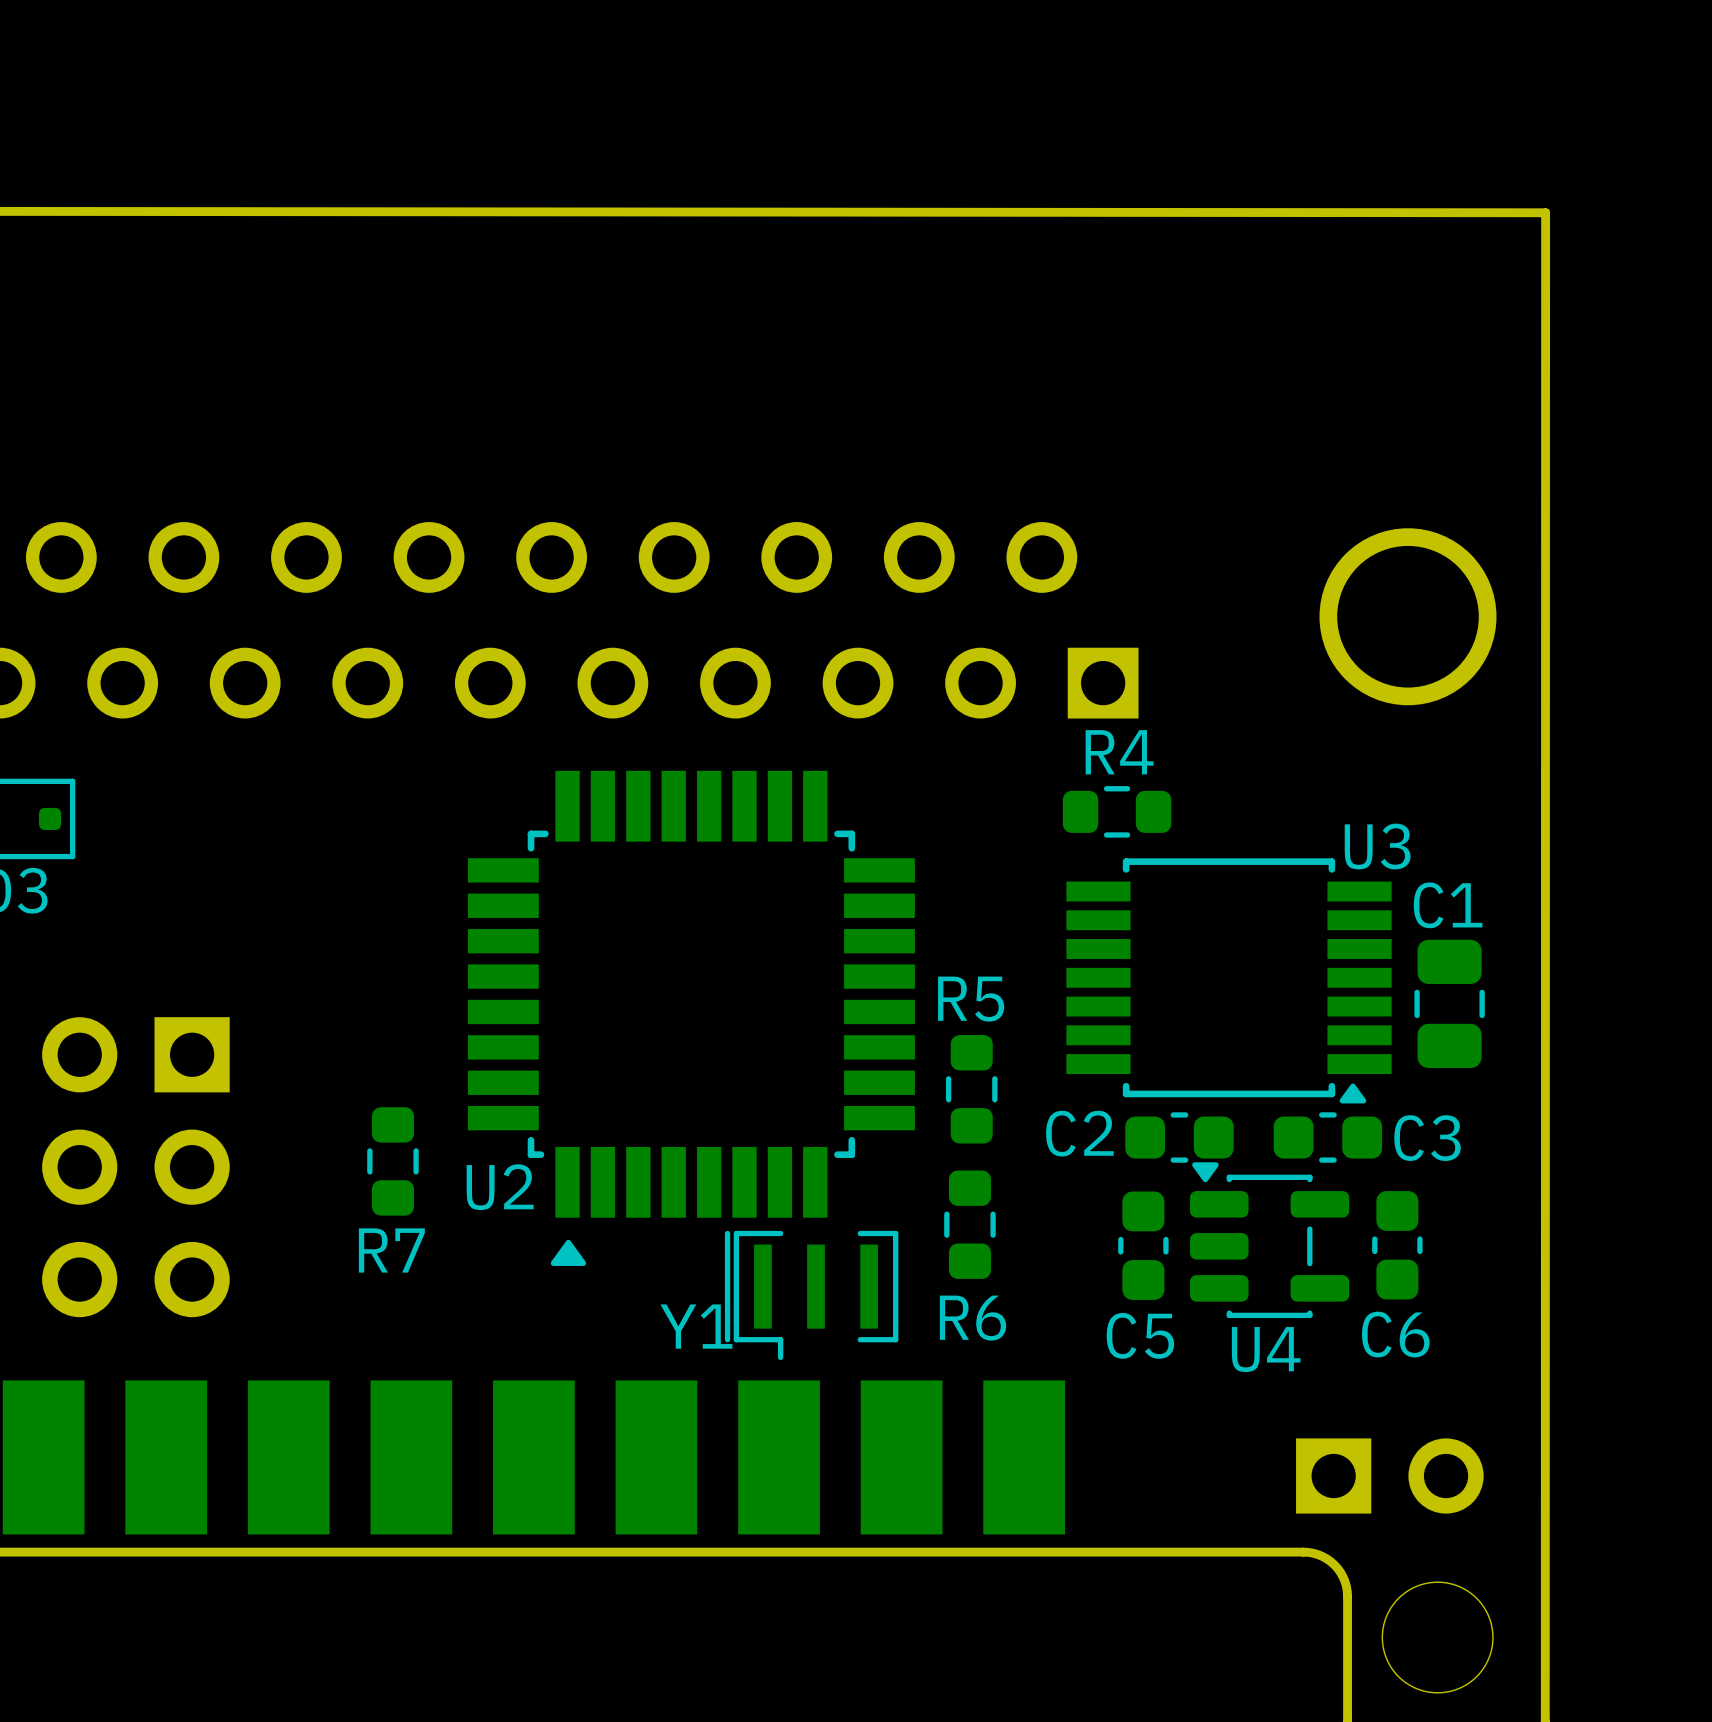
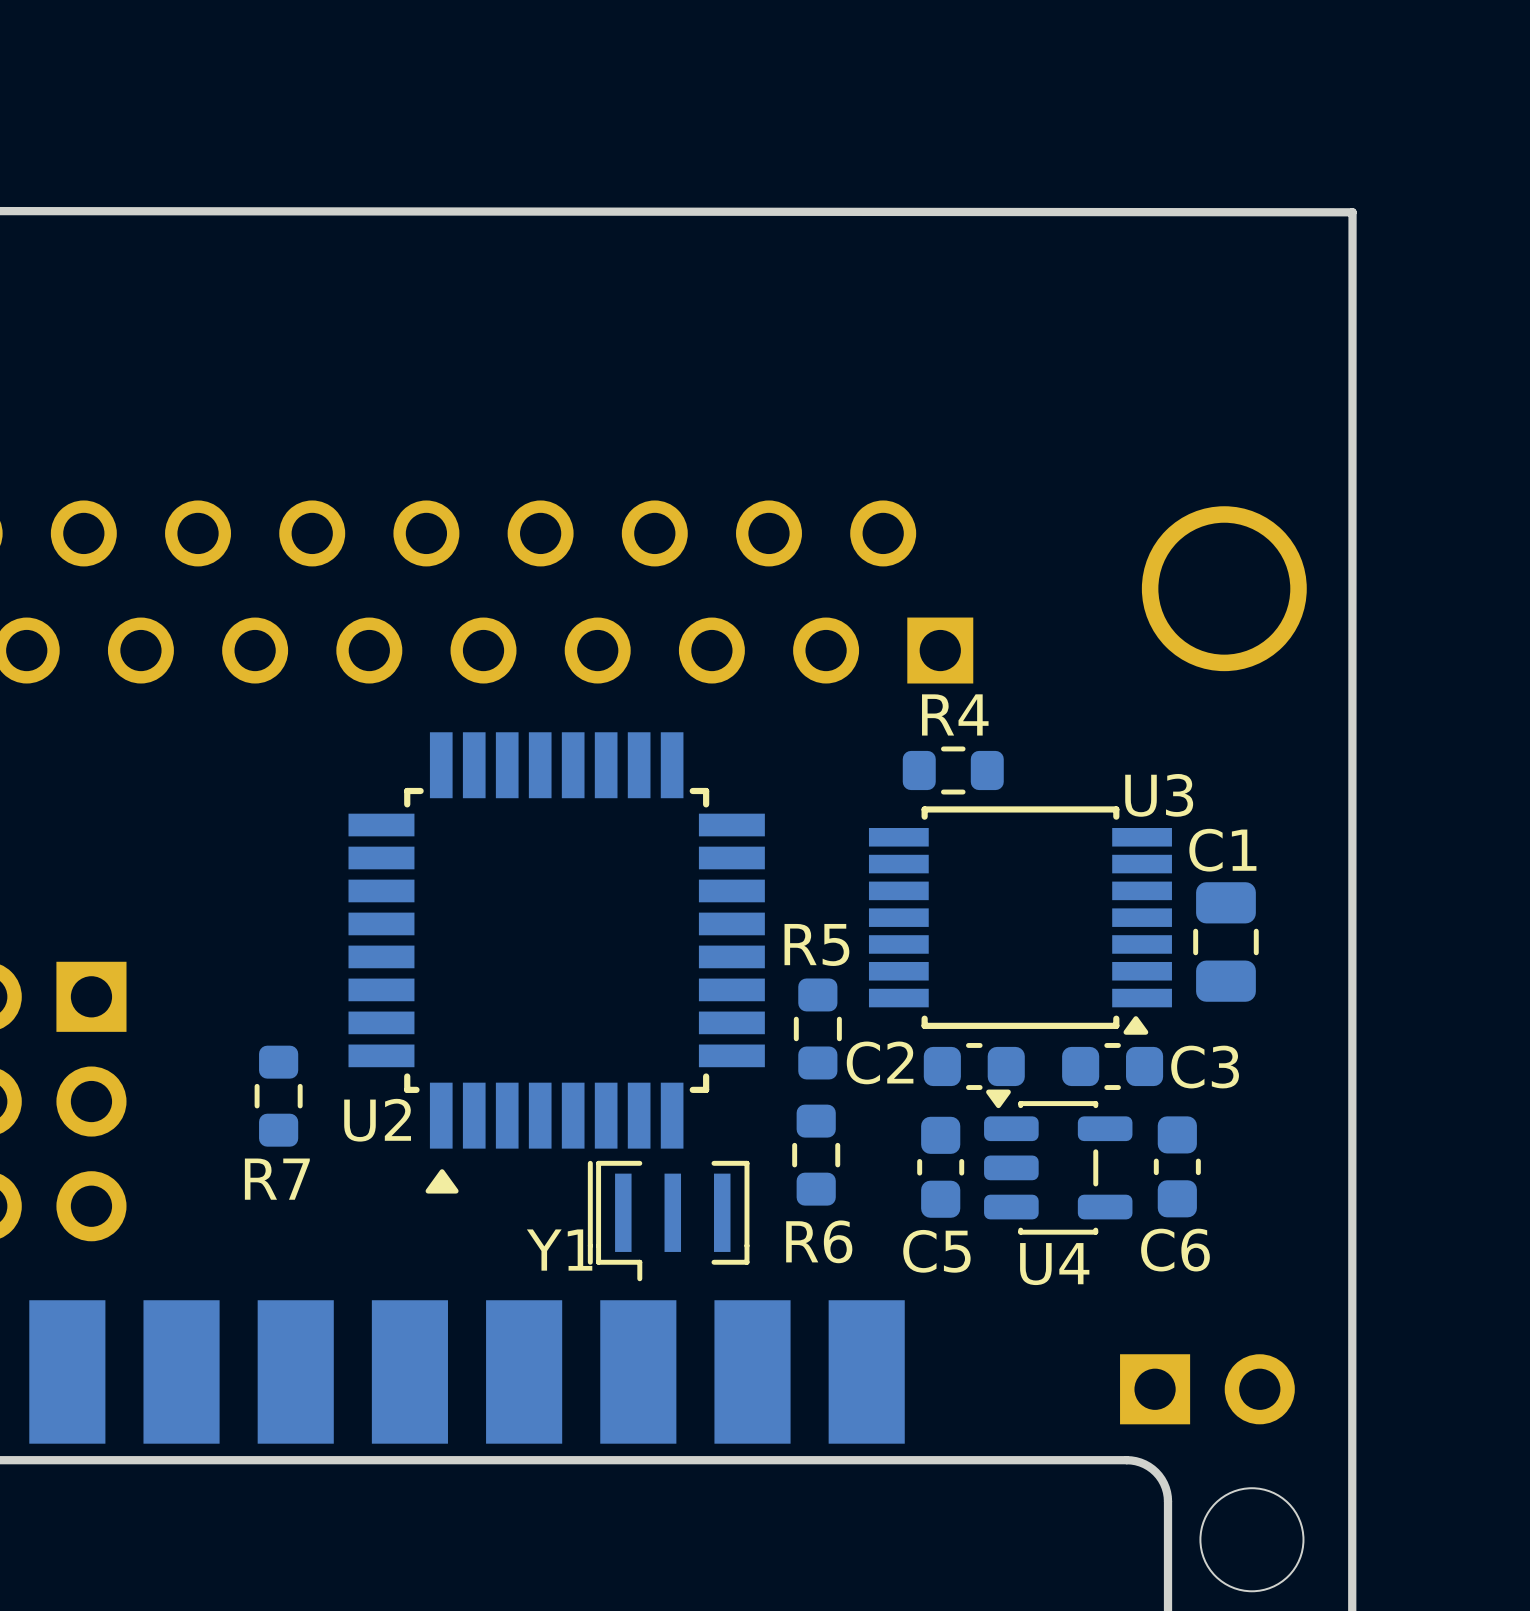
U3 position: (1229, 980) -> (1020, 920)
C1 position: (1449, 1003) -> (1225, 941)
C2 position: (1179, 1137) -> (974, 1066)
C3 position: (1327, 1137) -> (1112, 1066)
U4 position: (1269, 1240) -> (1058, 1162)
C5 position: (1143, 1245) -> (940, 1167)
C6 position: (1397, 1245) -> (1177, 1166)

